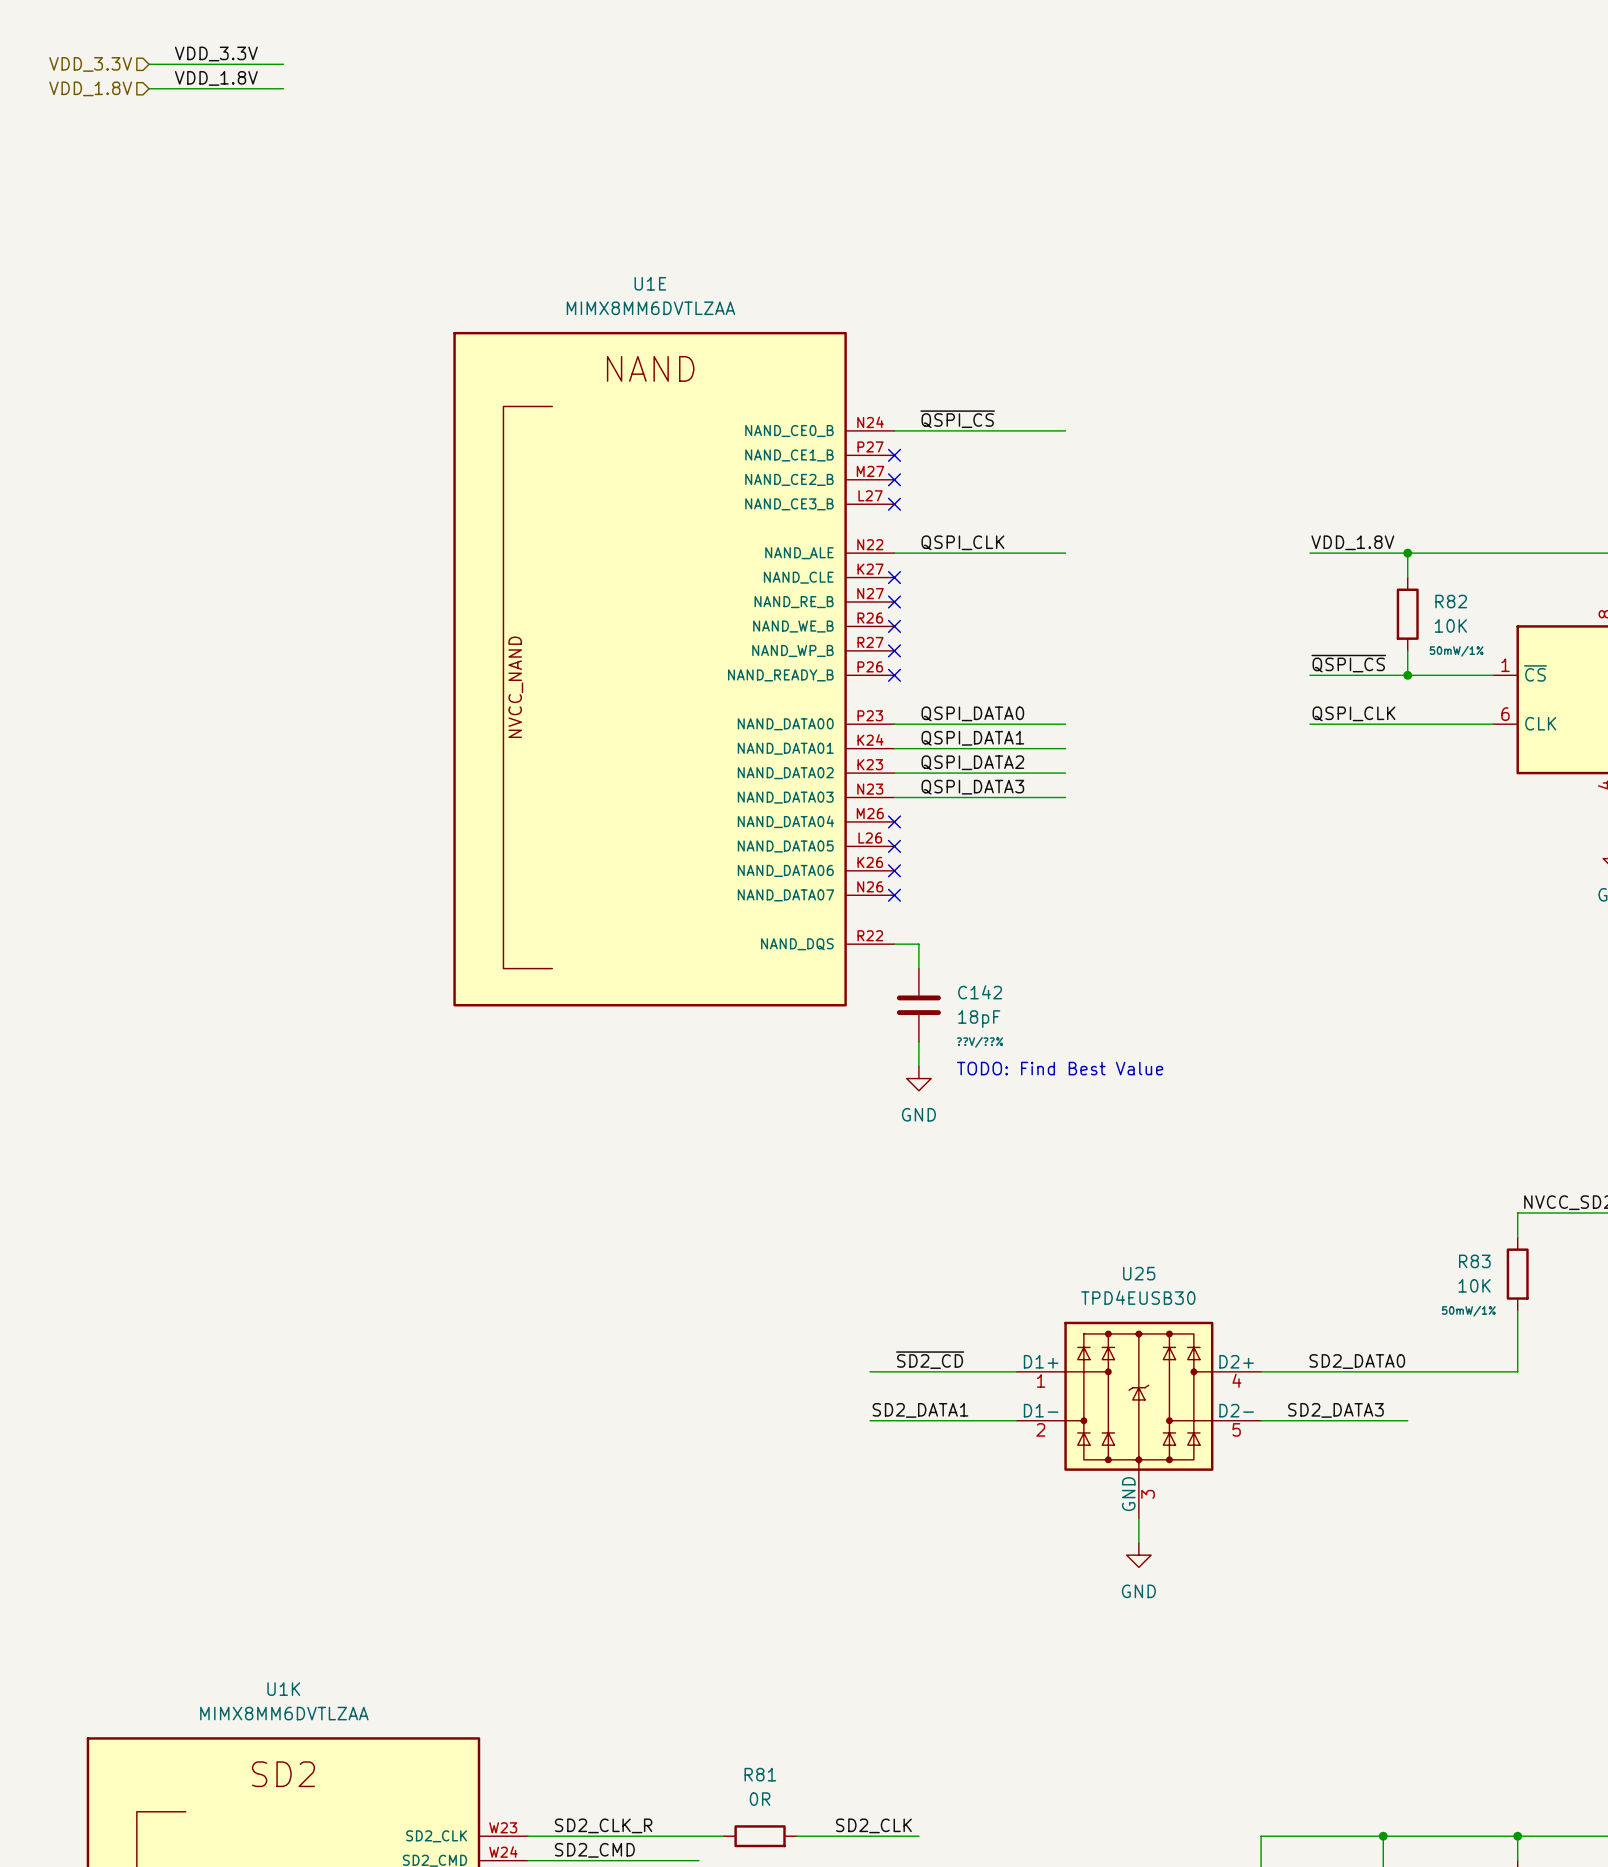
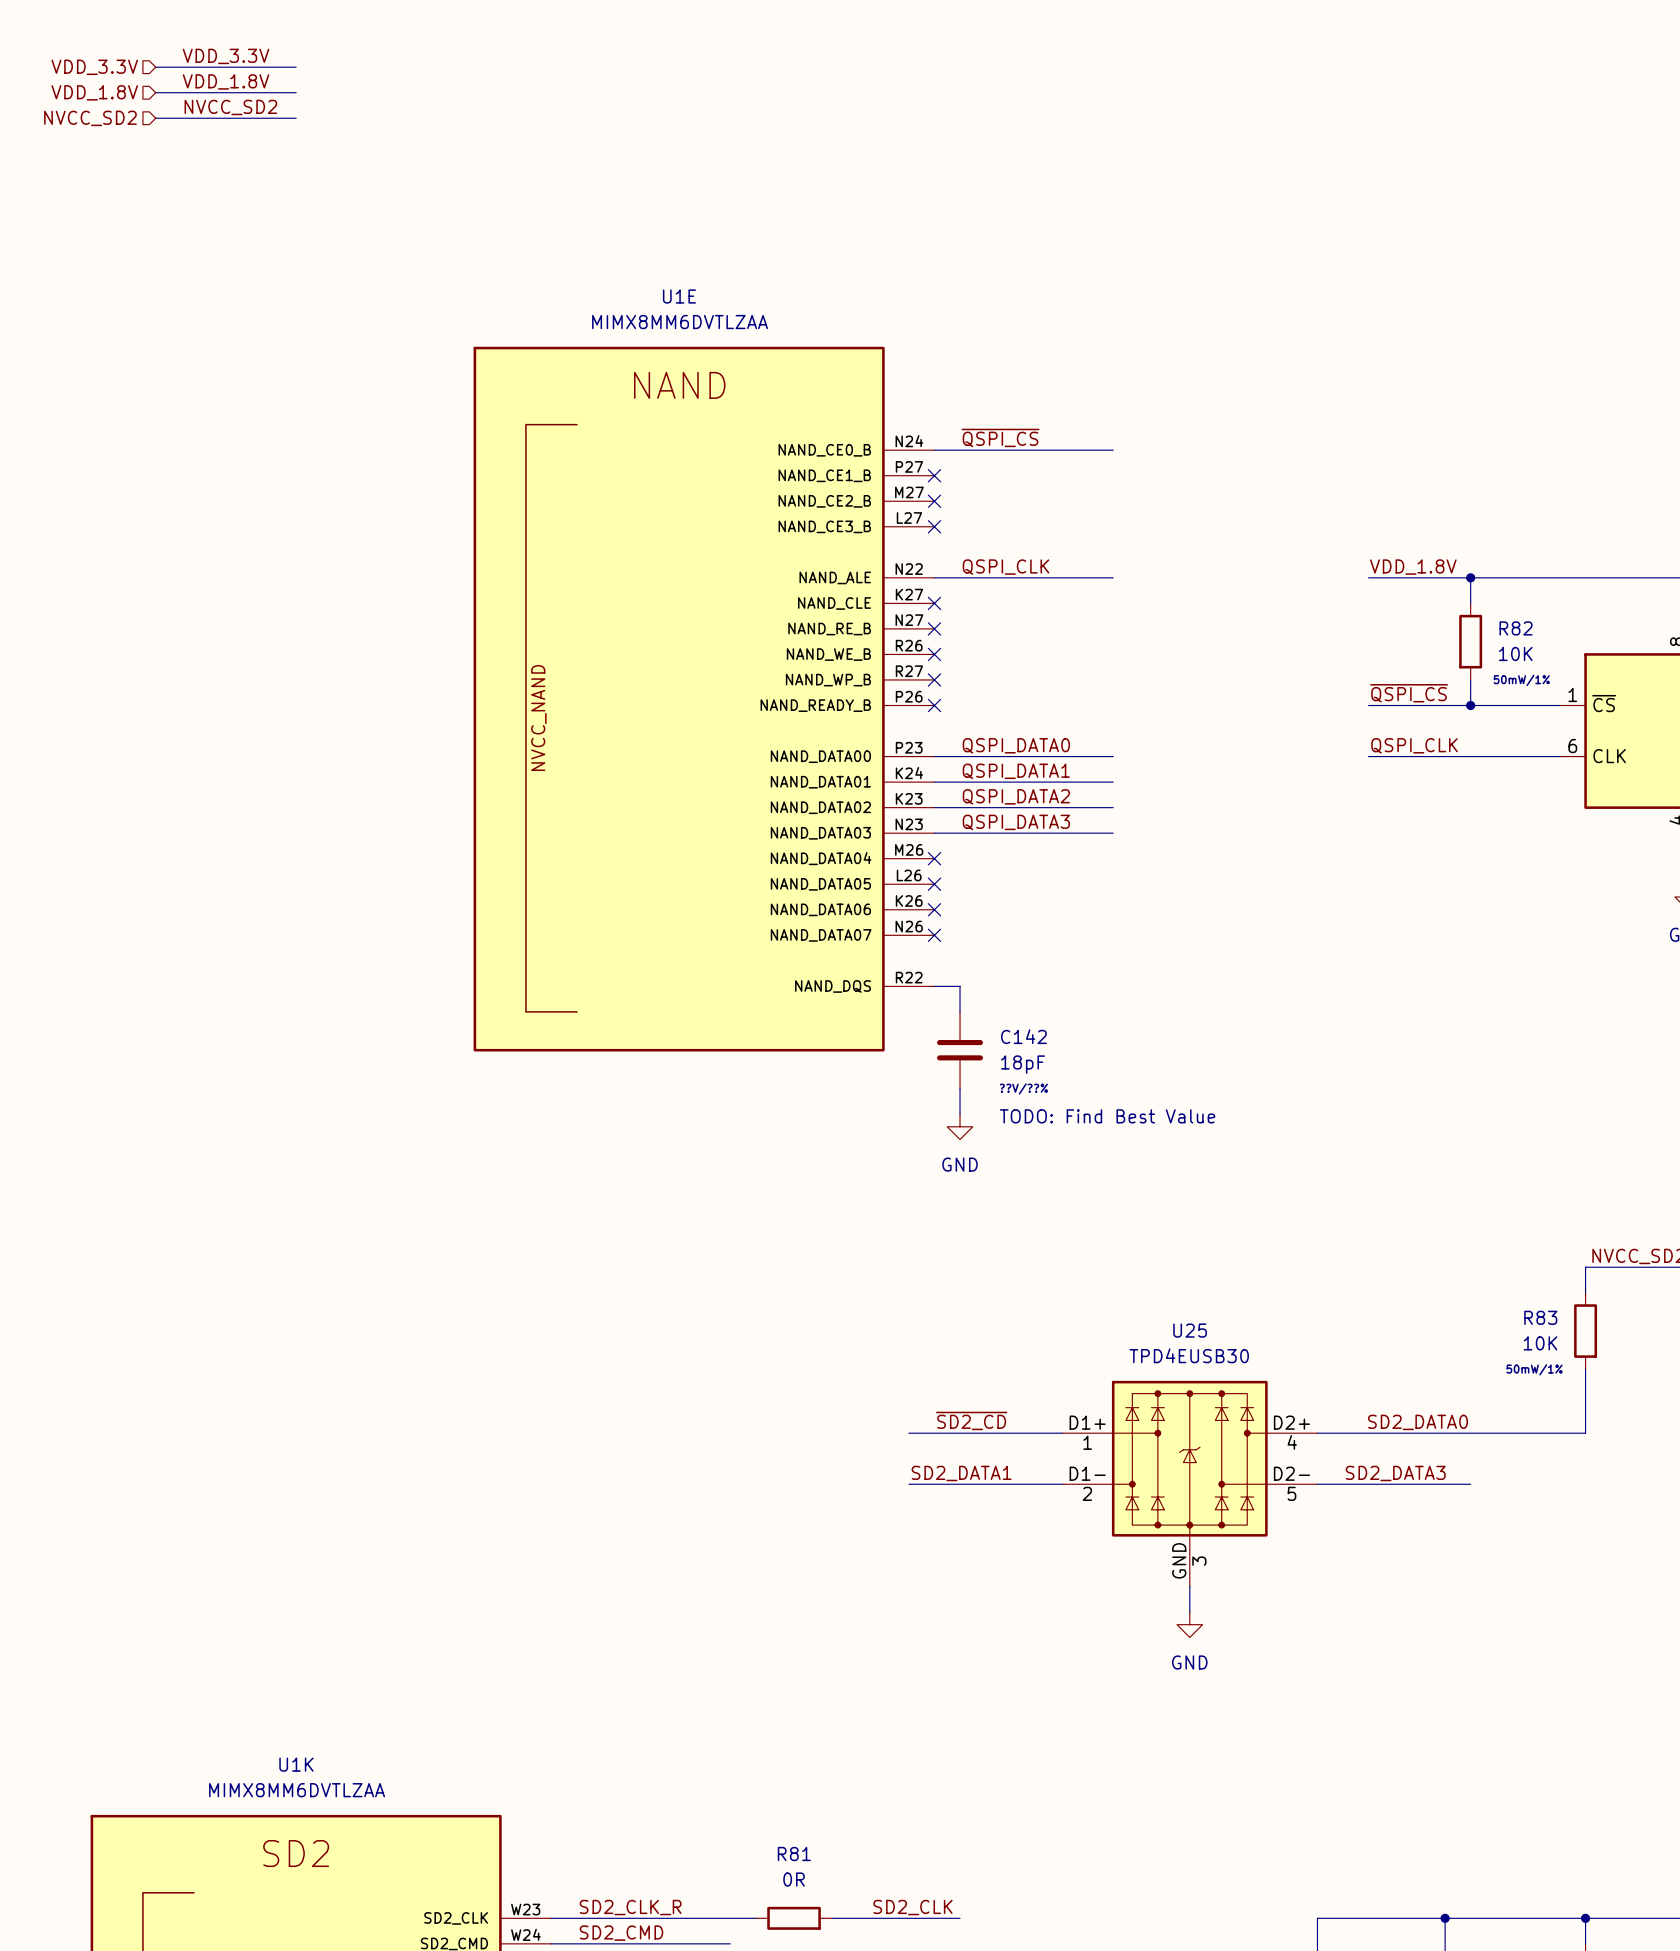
label: none -> NVCC_SD2 (230, 107)
hierarchical label: none -> NVCC_SD2 (90, 118)
wire: none -> (155, 118) (296, 118)

